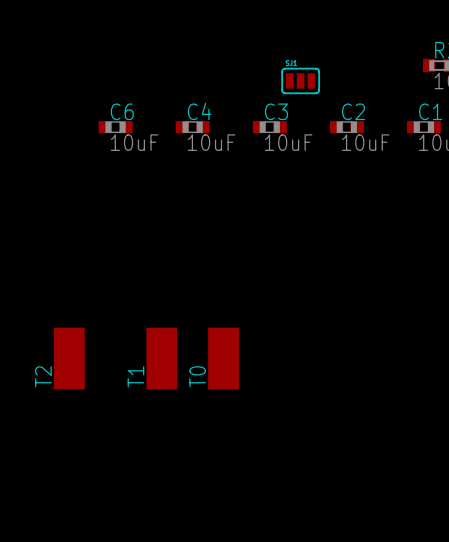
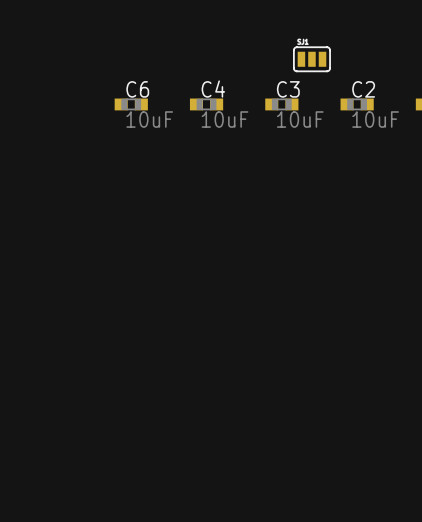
T2: (69, 358) -> none
T1: (161, 358) -> none
T0: (223, 358) -> none

